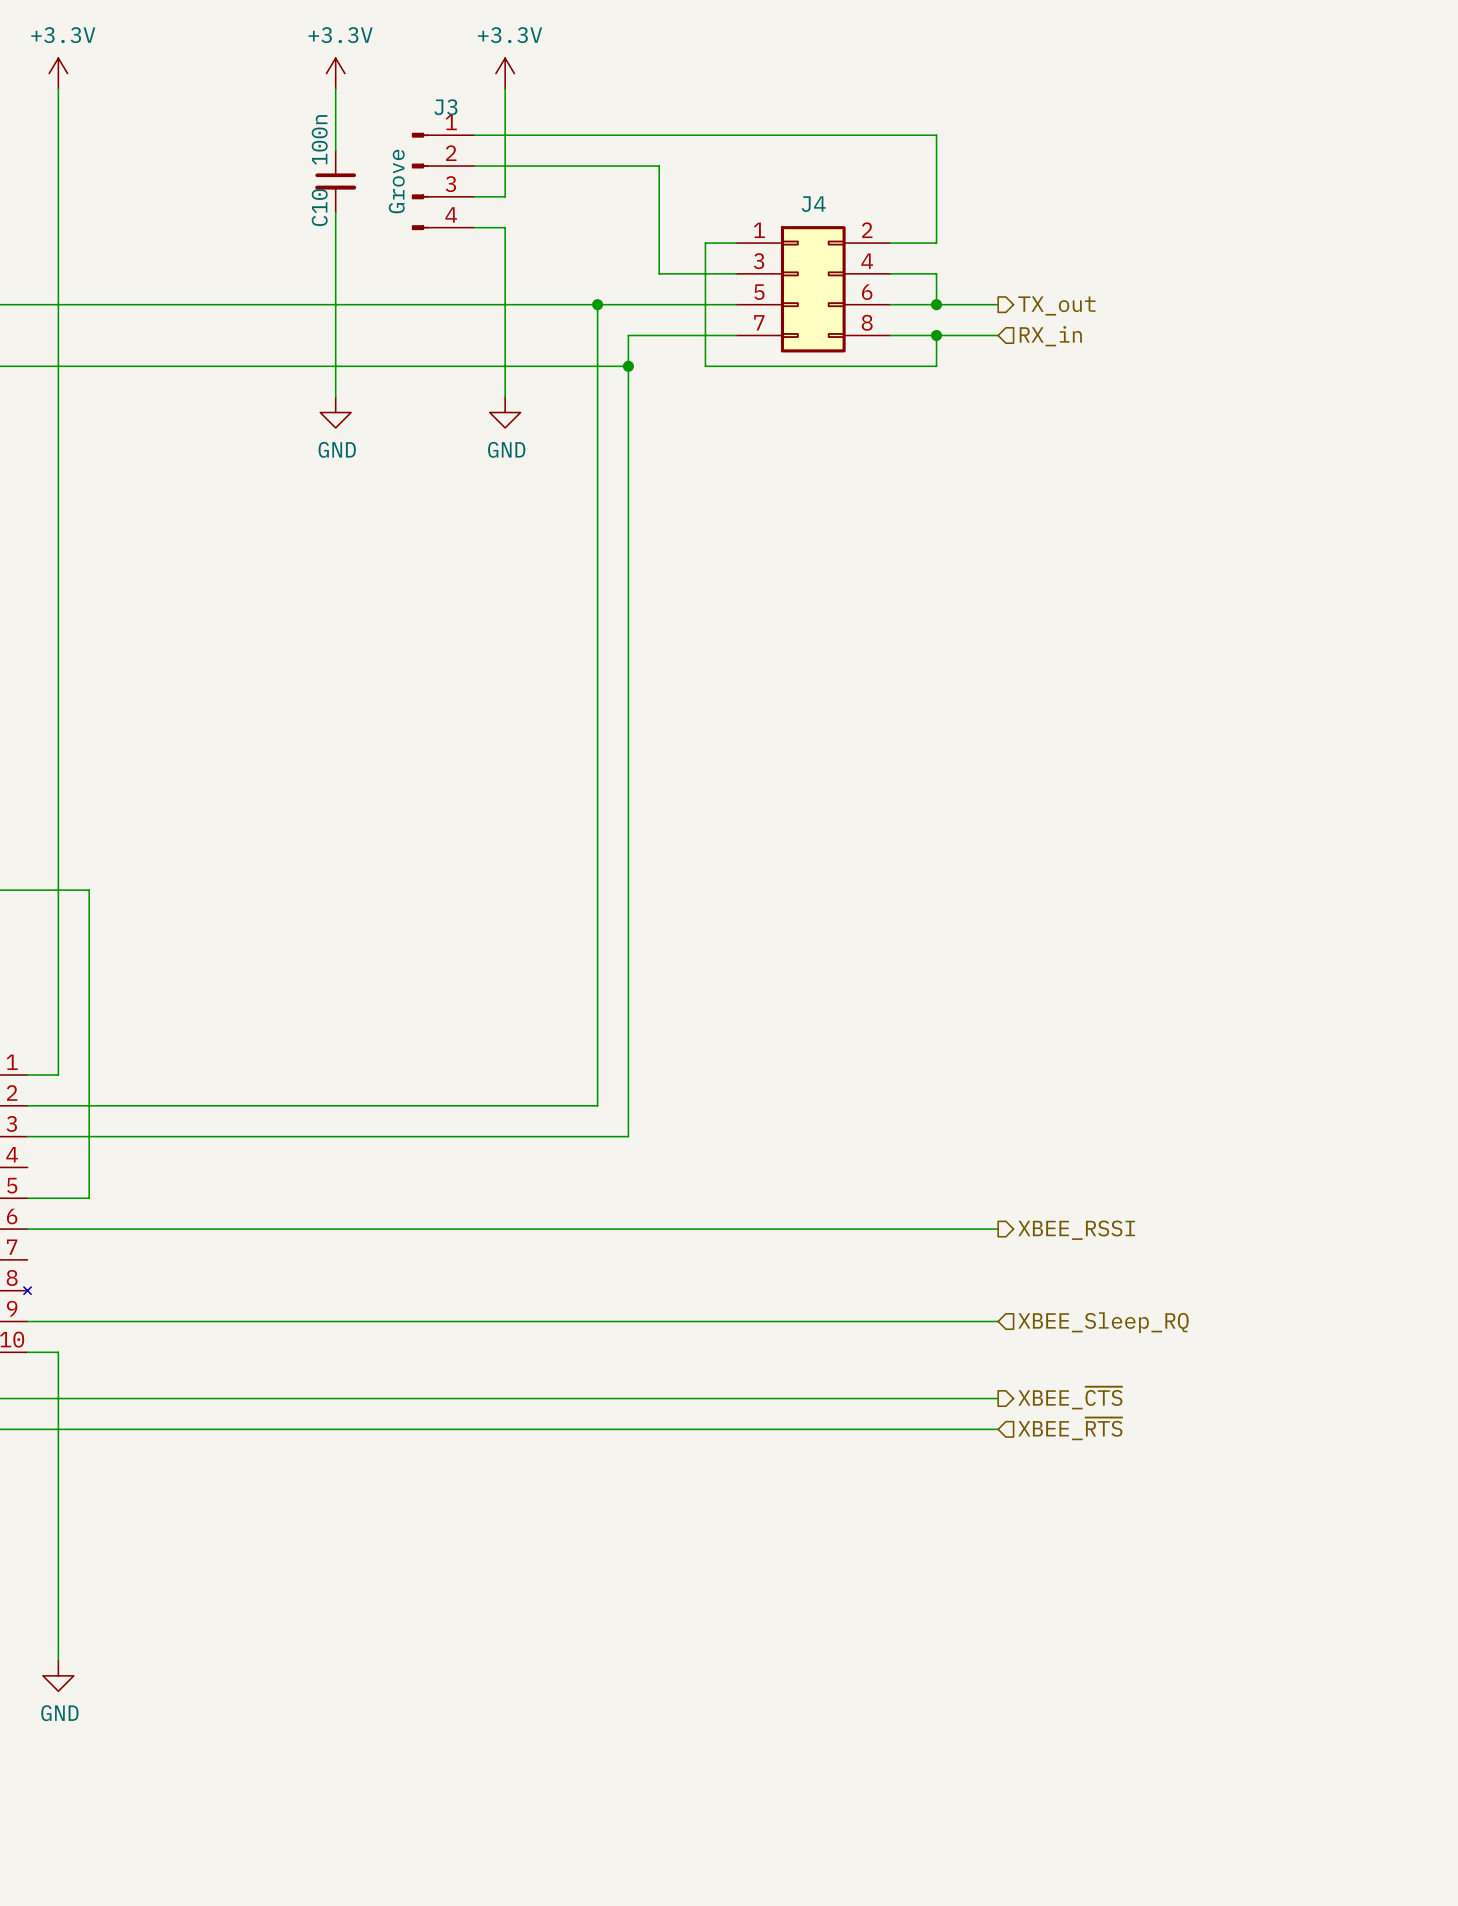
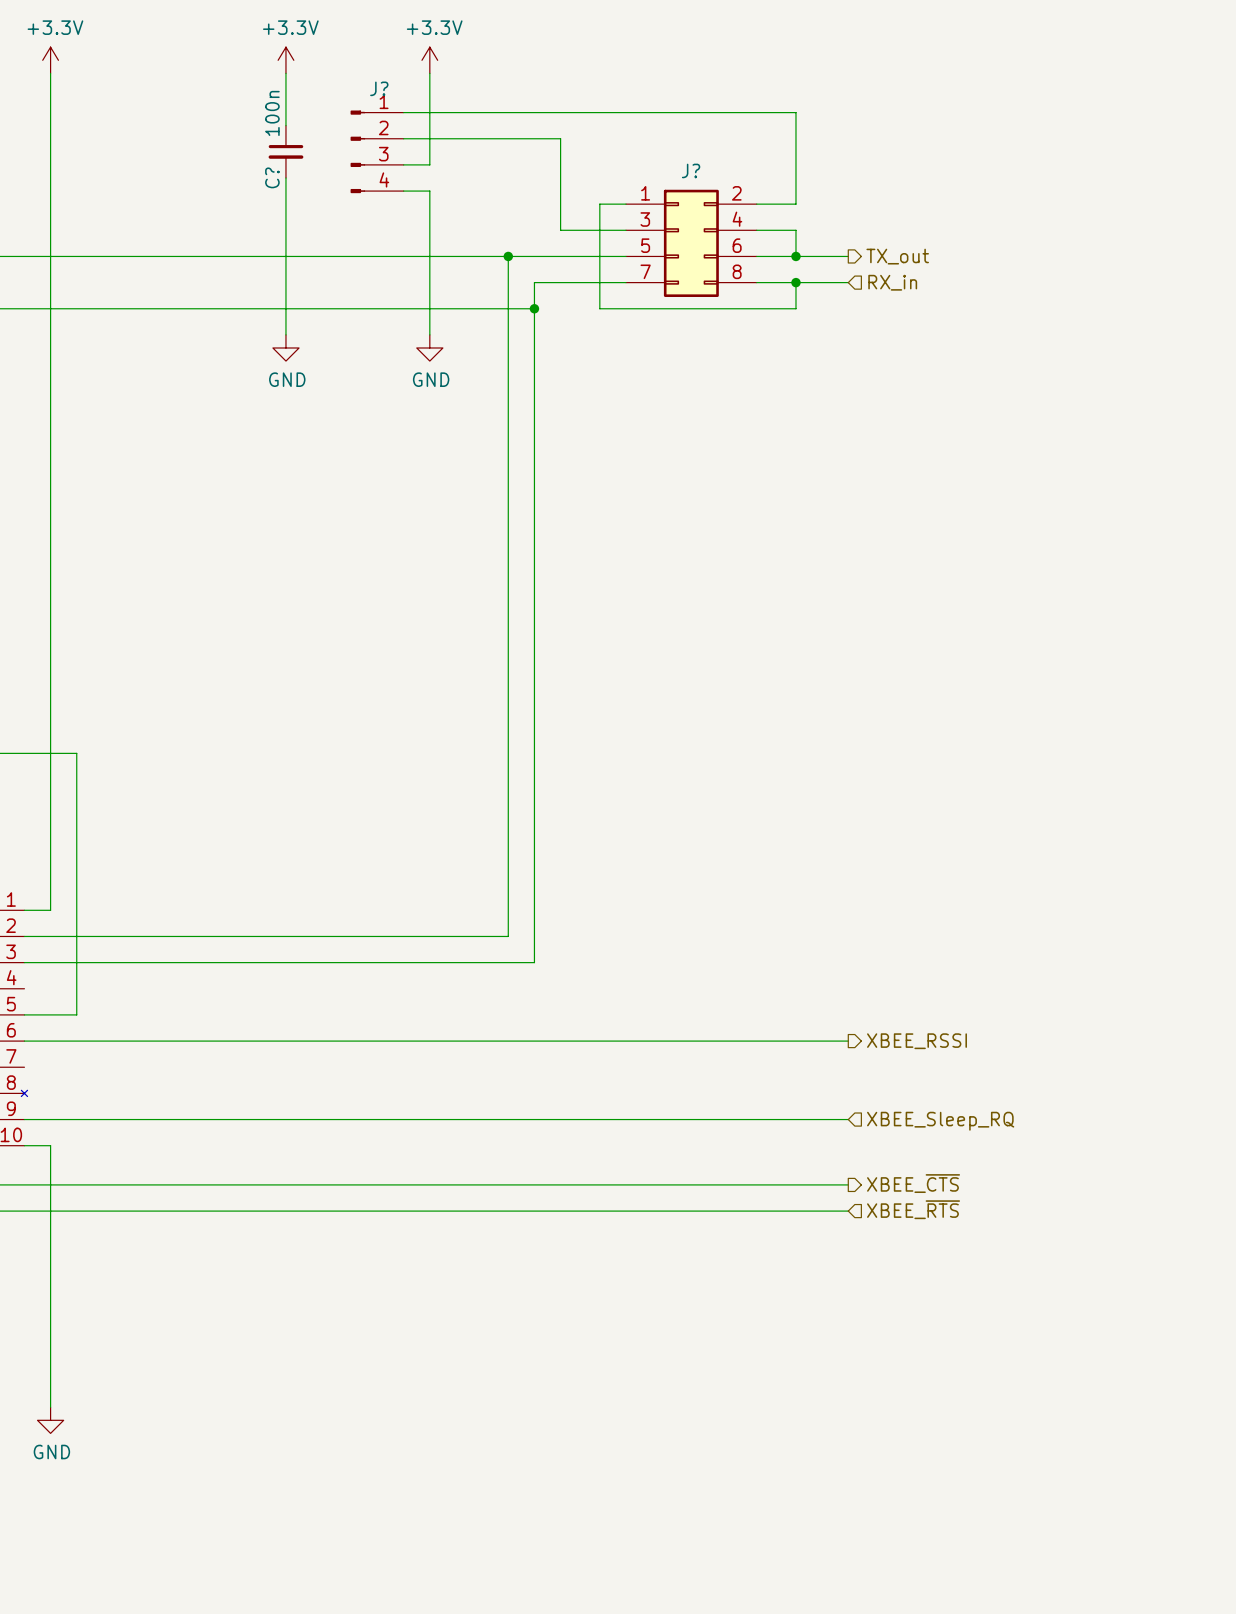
J3 name: J3 (445, 107) -> J? (379, 88)
J3 value: Grove (396, 181) -> none
J4 name: J4 (813, 204) -> J? (691, 170)
C10 name: C10 (319, 207) -> C? (272, 177)

